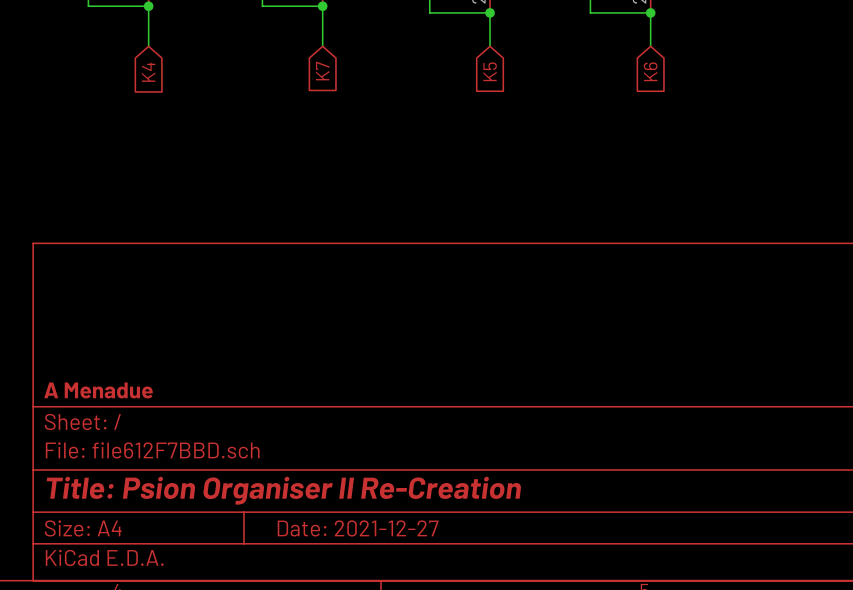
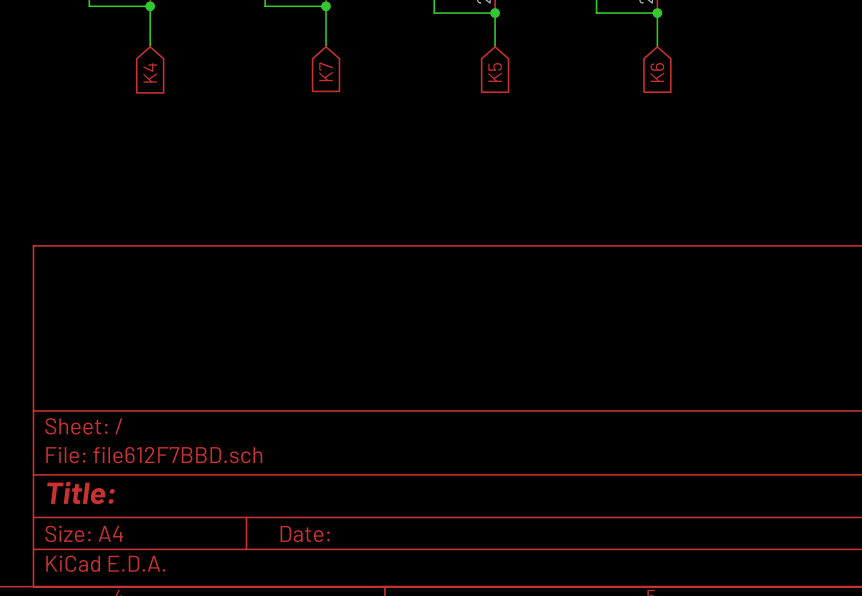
title block: A Menadue (98, 390) -> none
title block: Title: Psion Organiser II Re-Creation (283, 490) -> Title: (81, 492)
title block: Date: 2021-12-27 (358, 528) -> Date: (305, 534)

